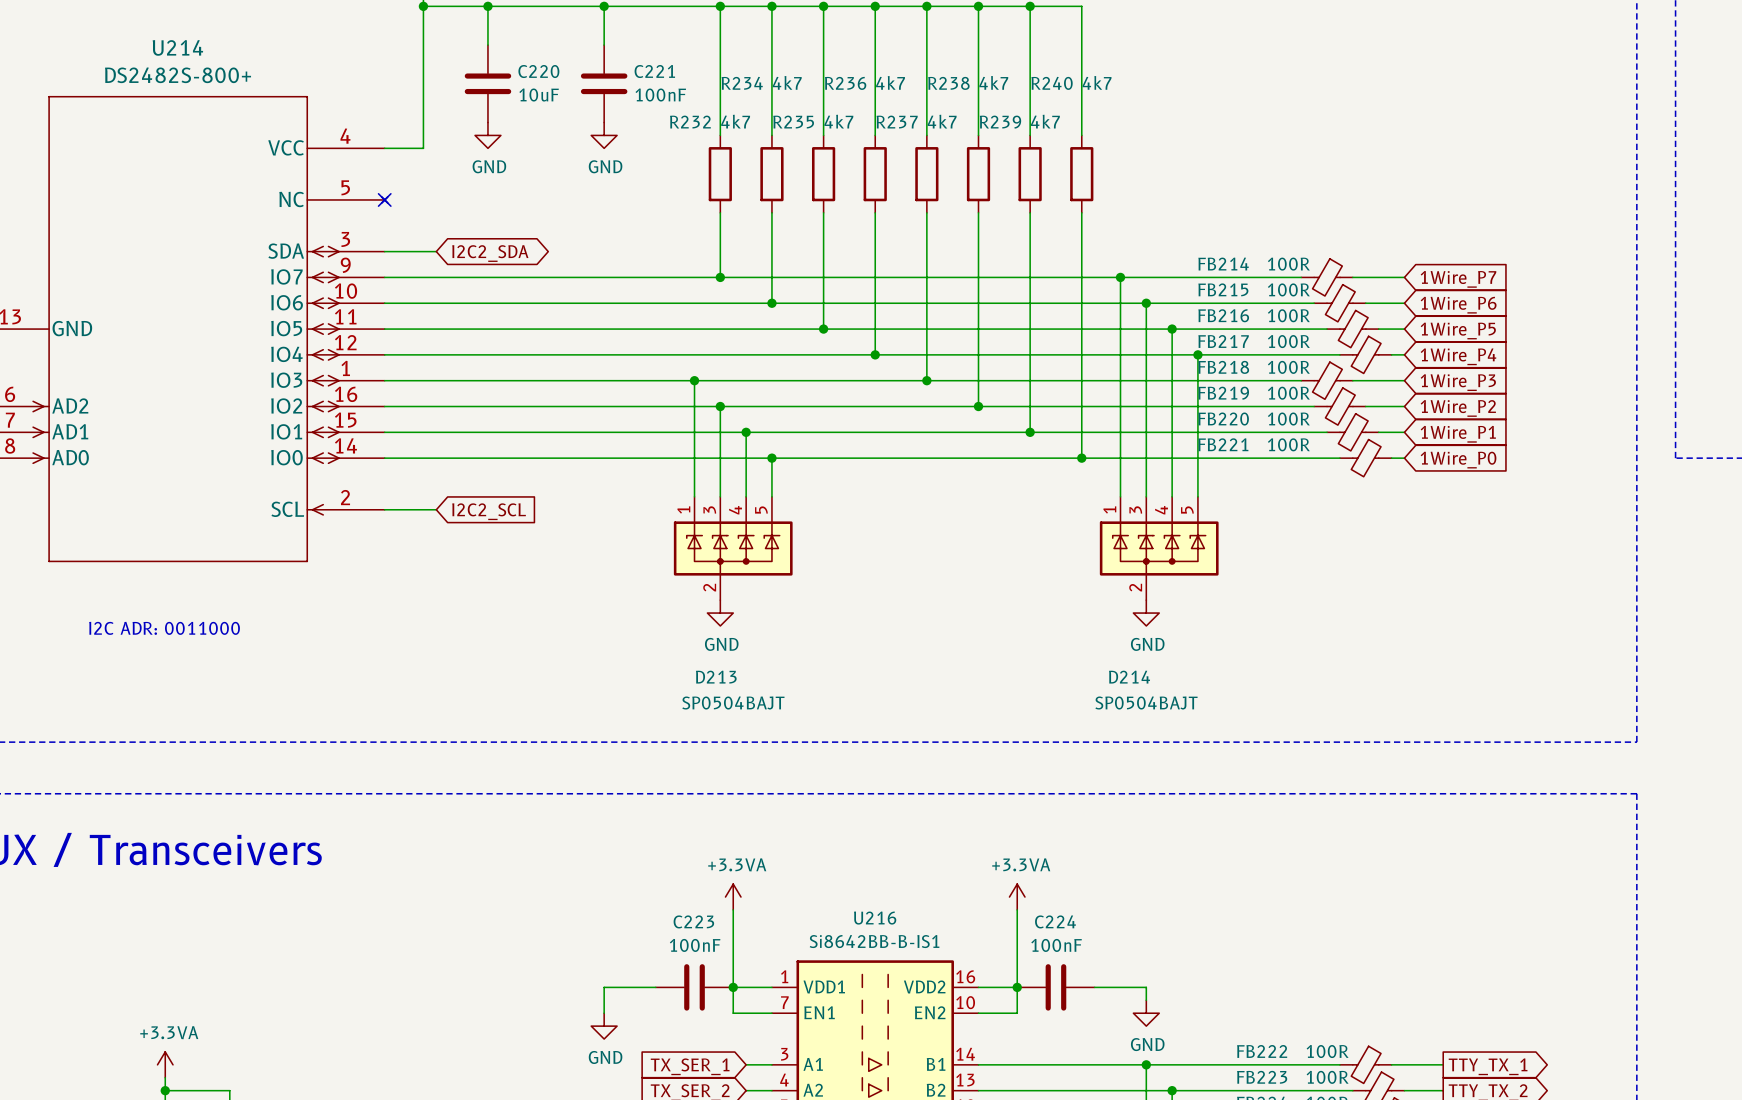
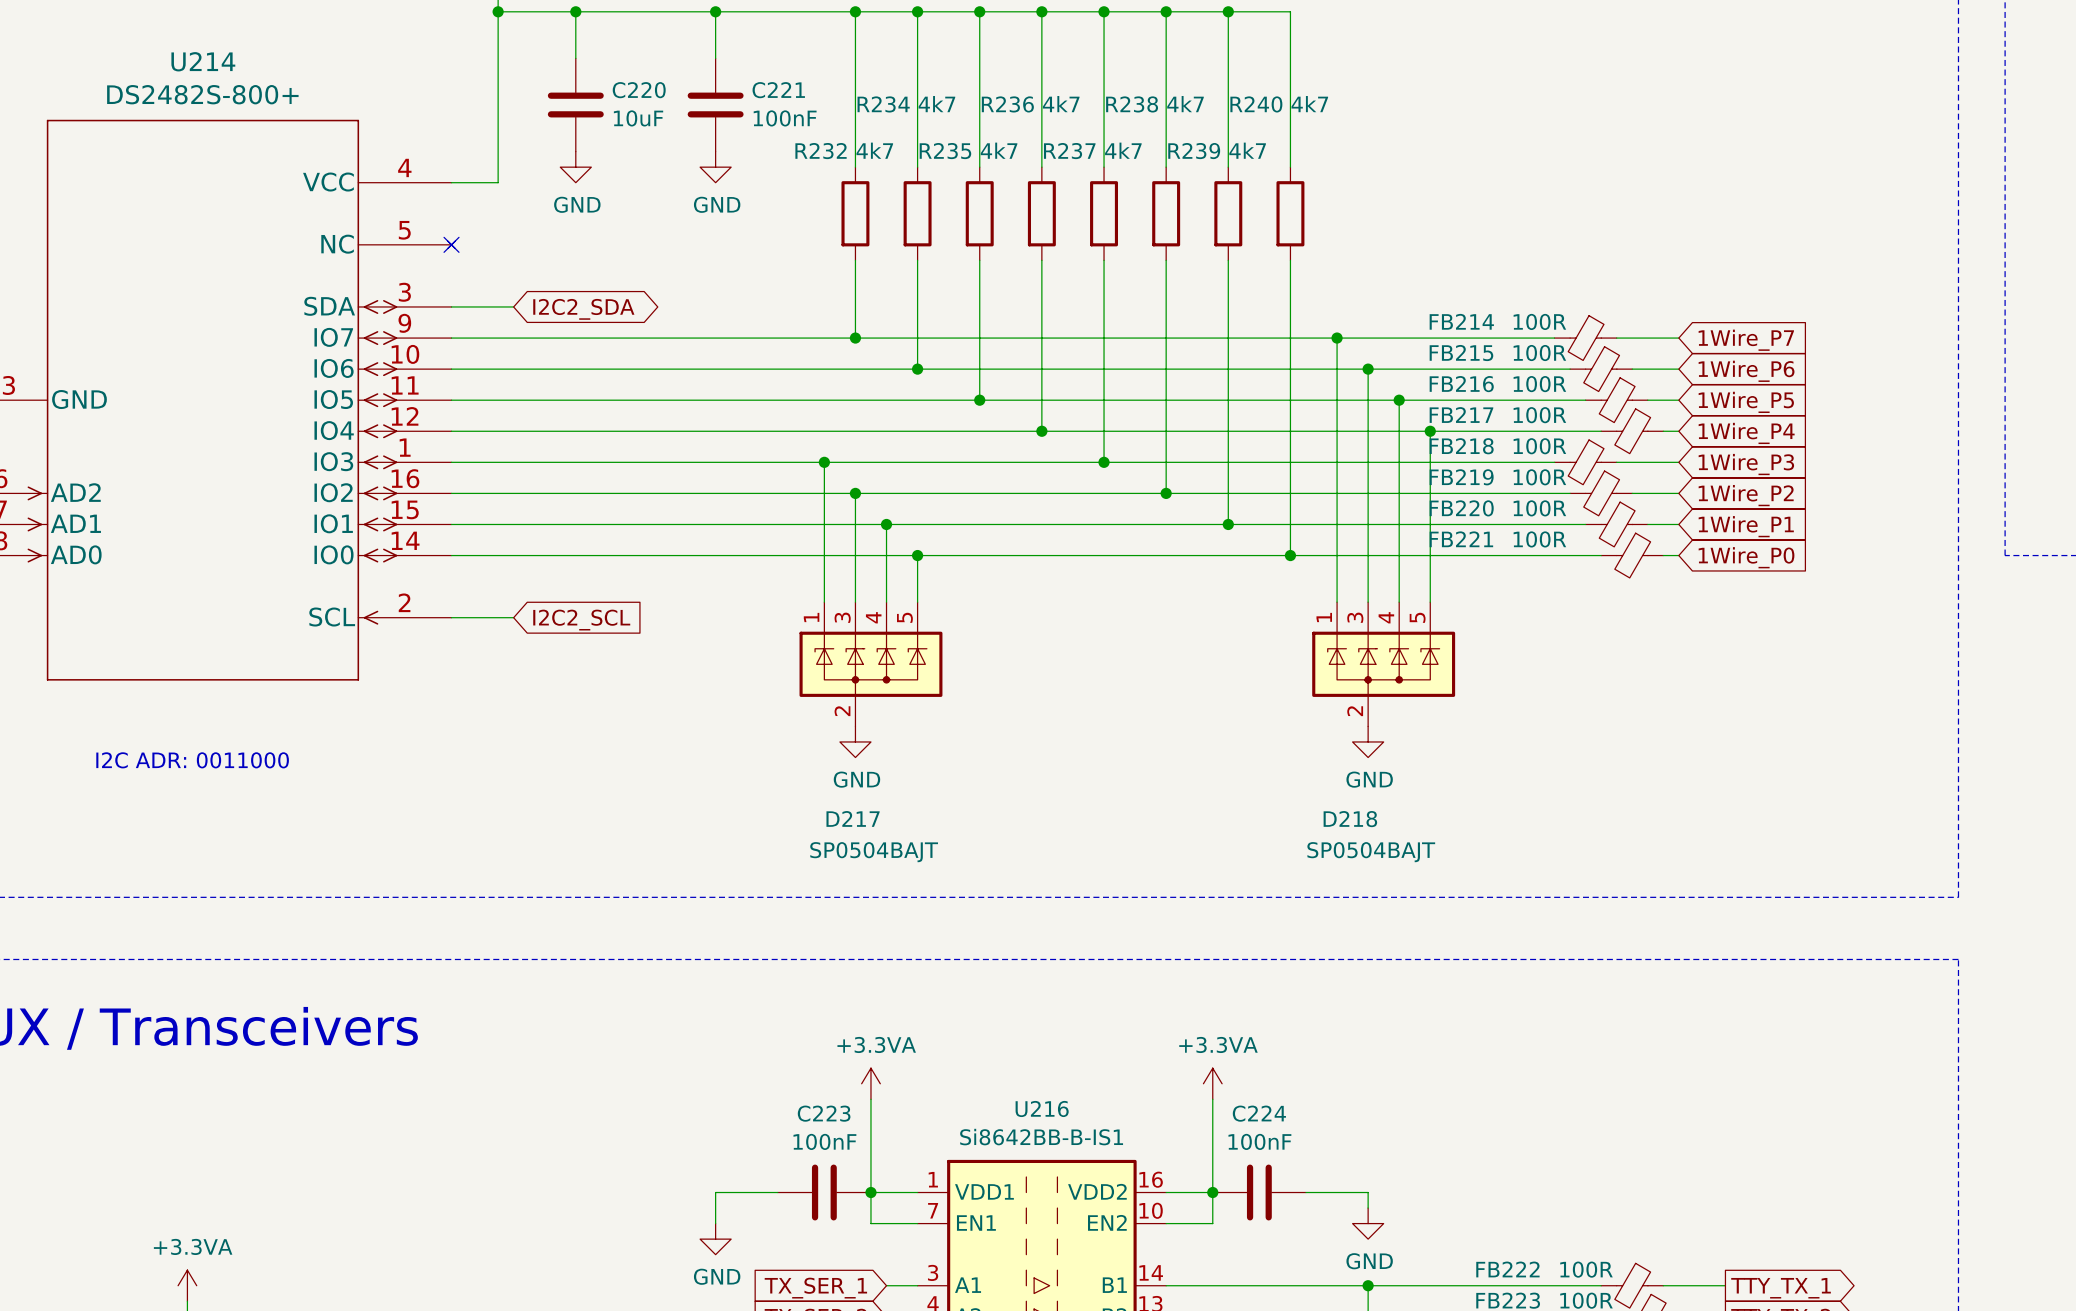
D213 name: D213 (716, 677) -> D217 (853, 818)
D214 name: D214 (1129, 677) -> D218 (1350, 819)

